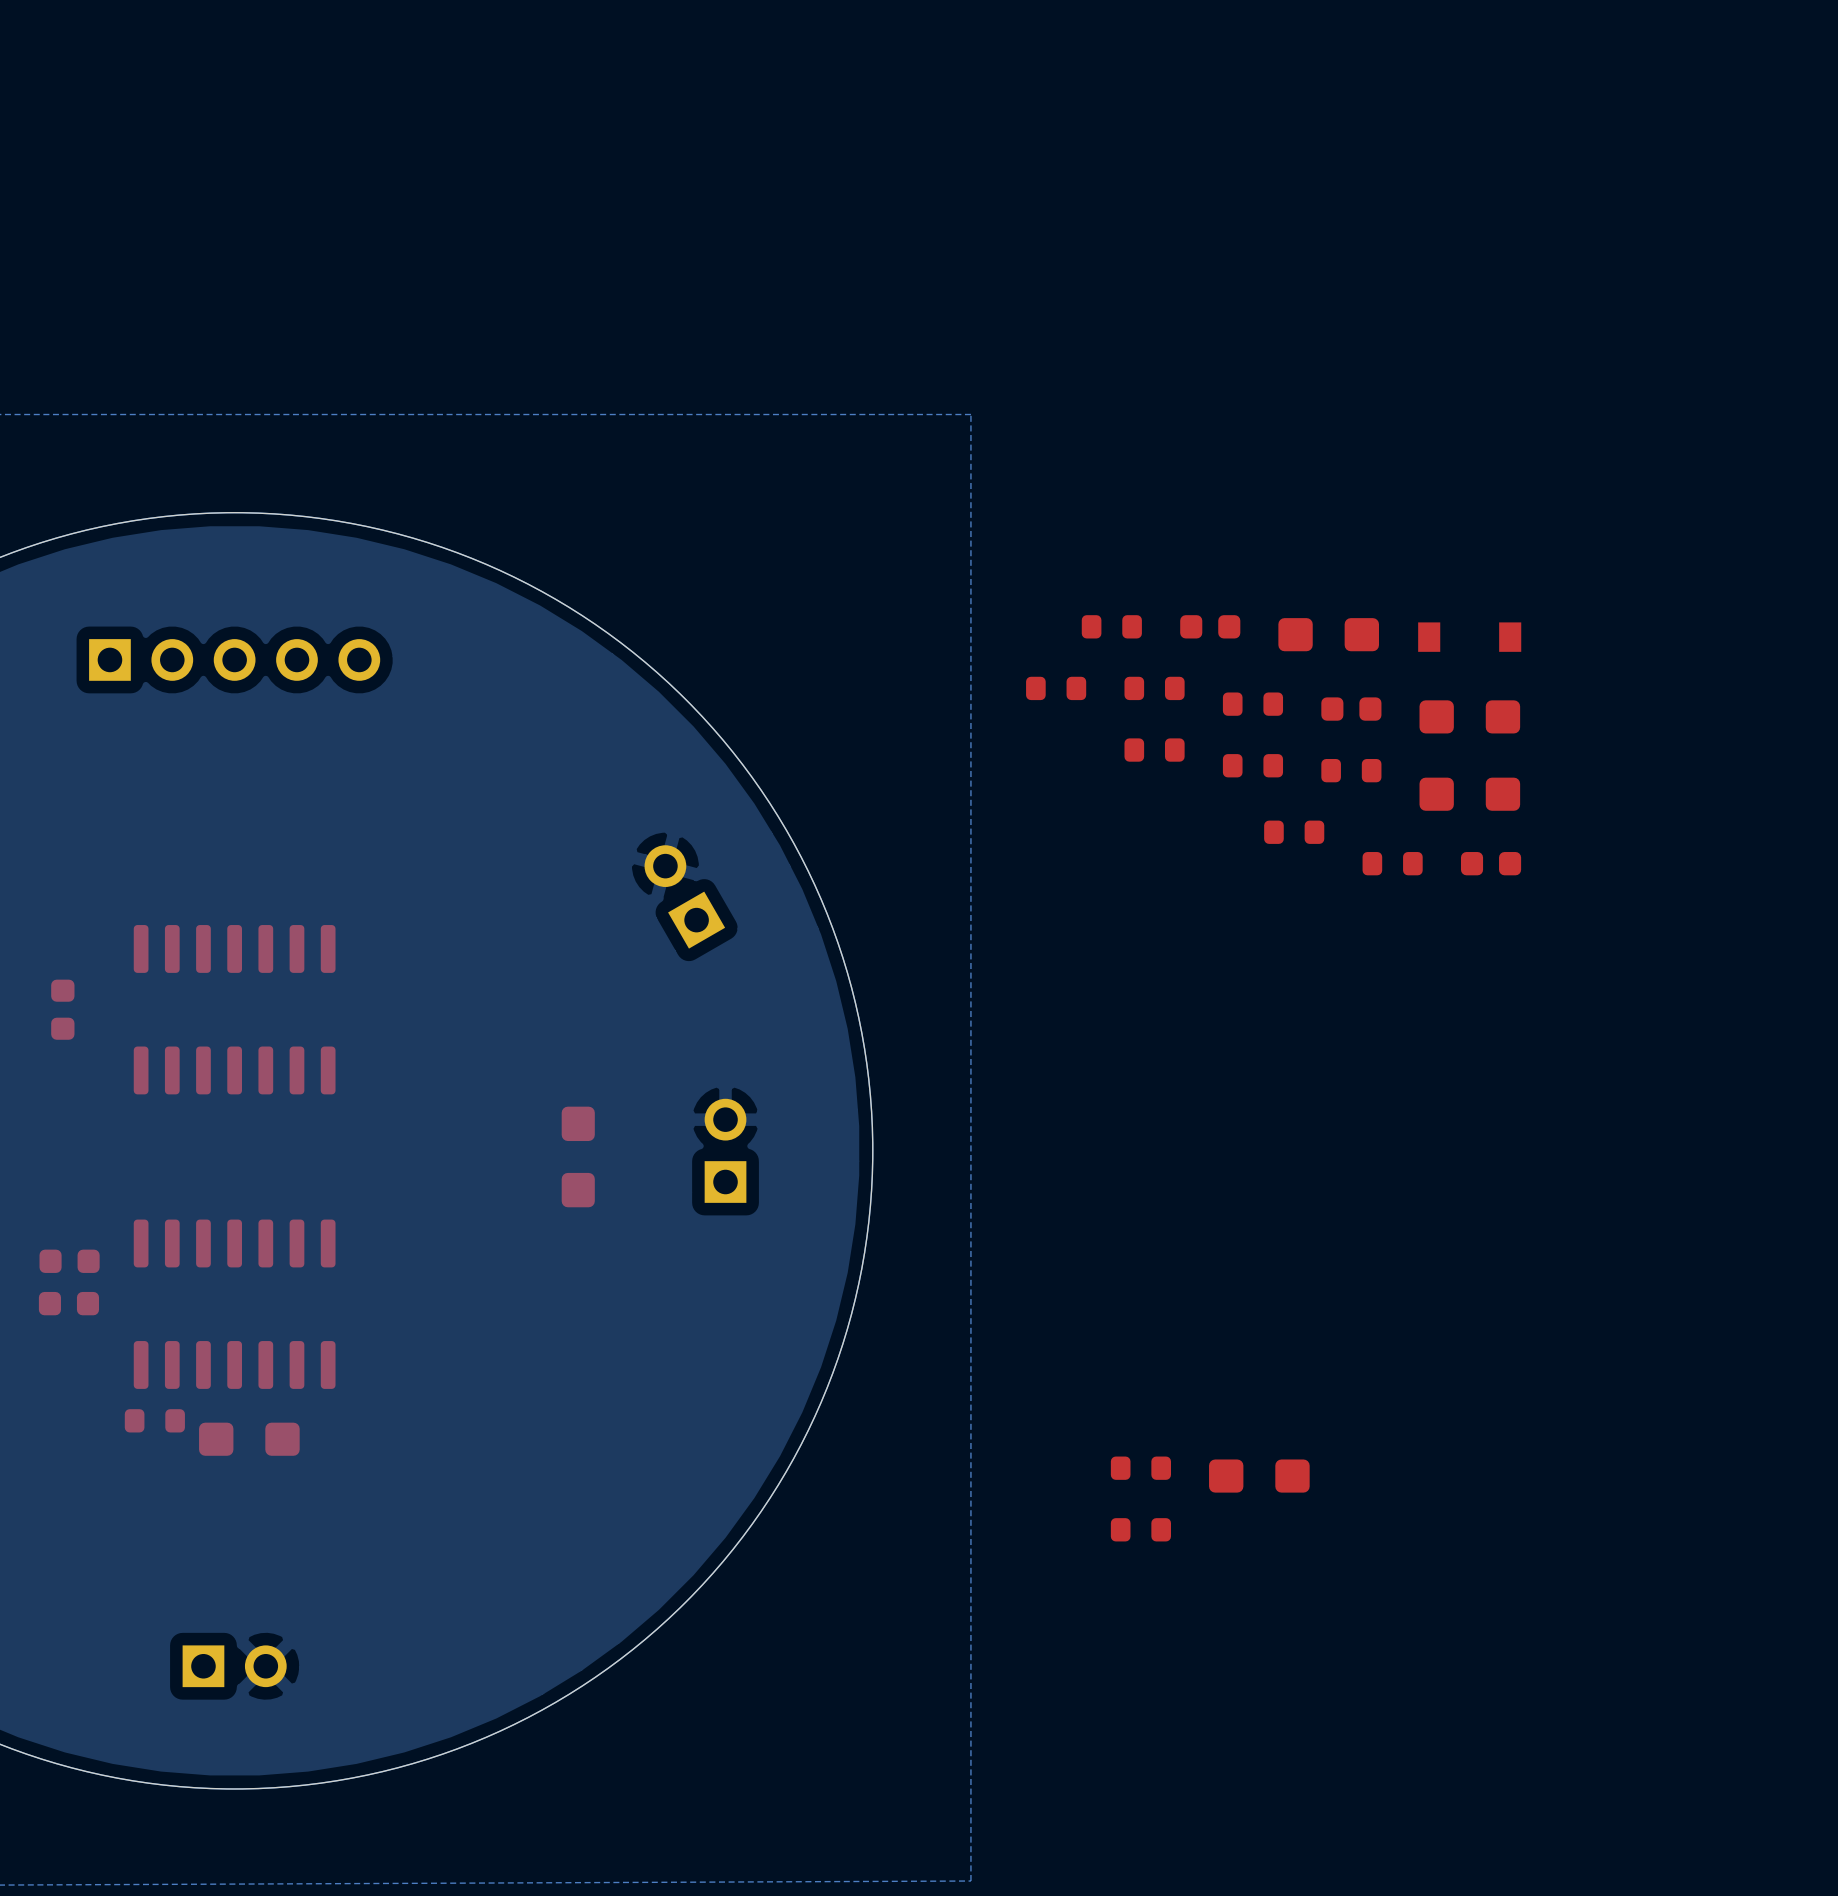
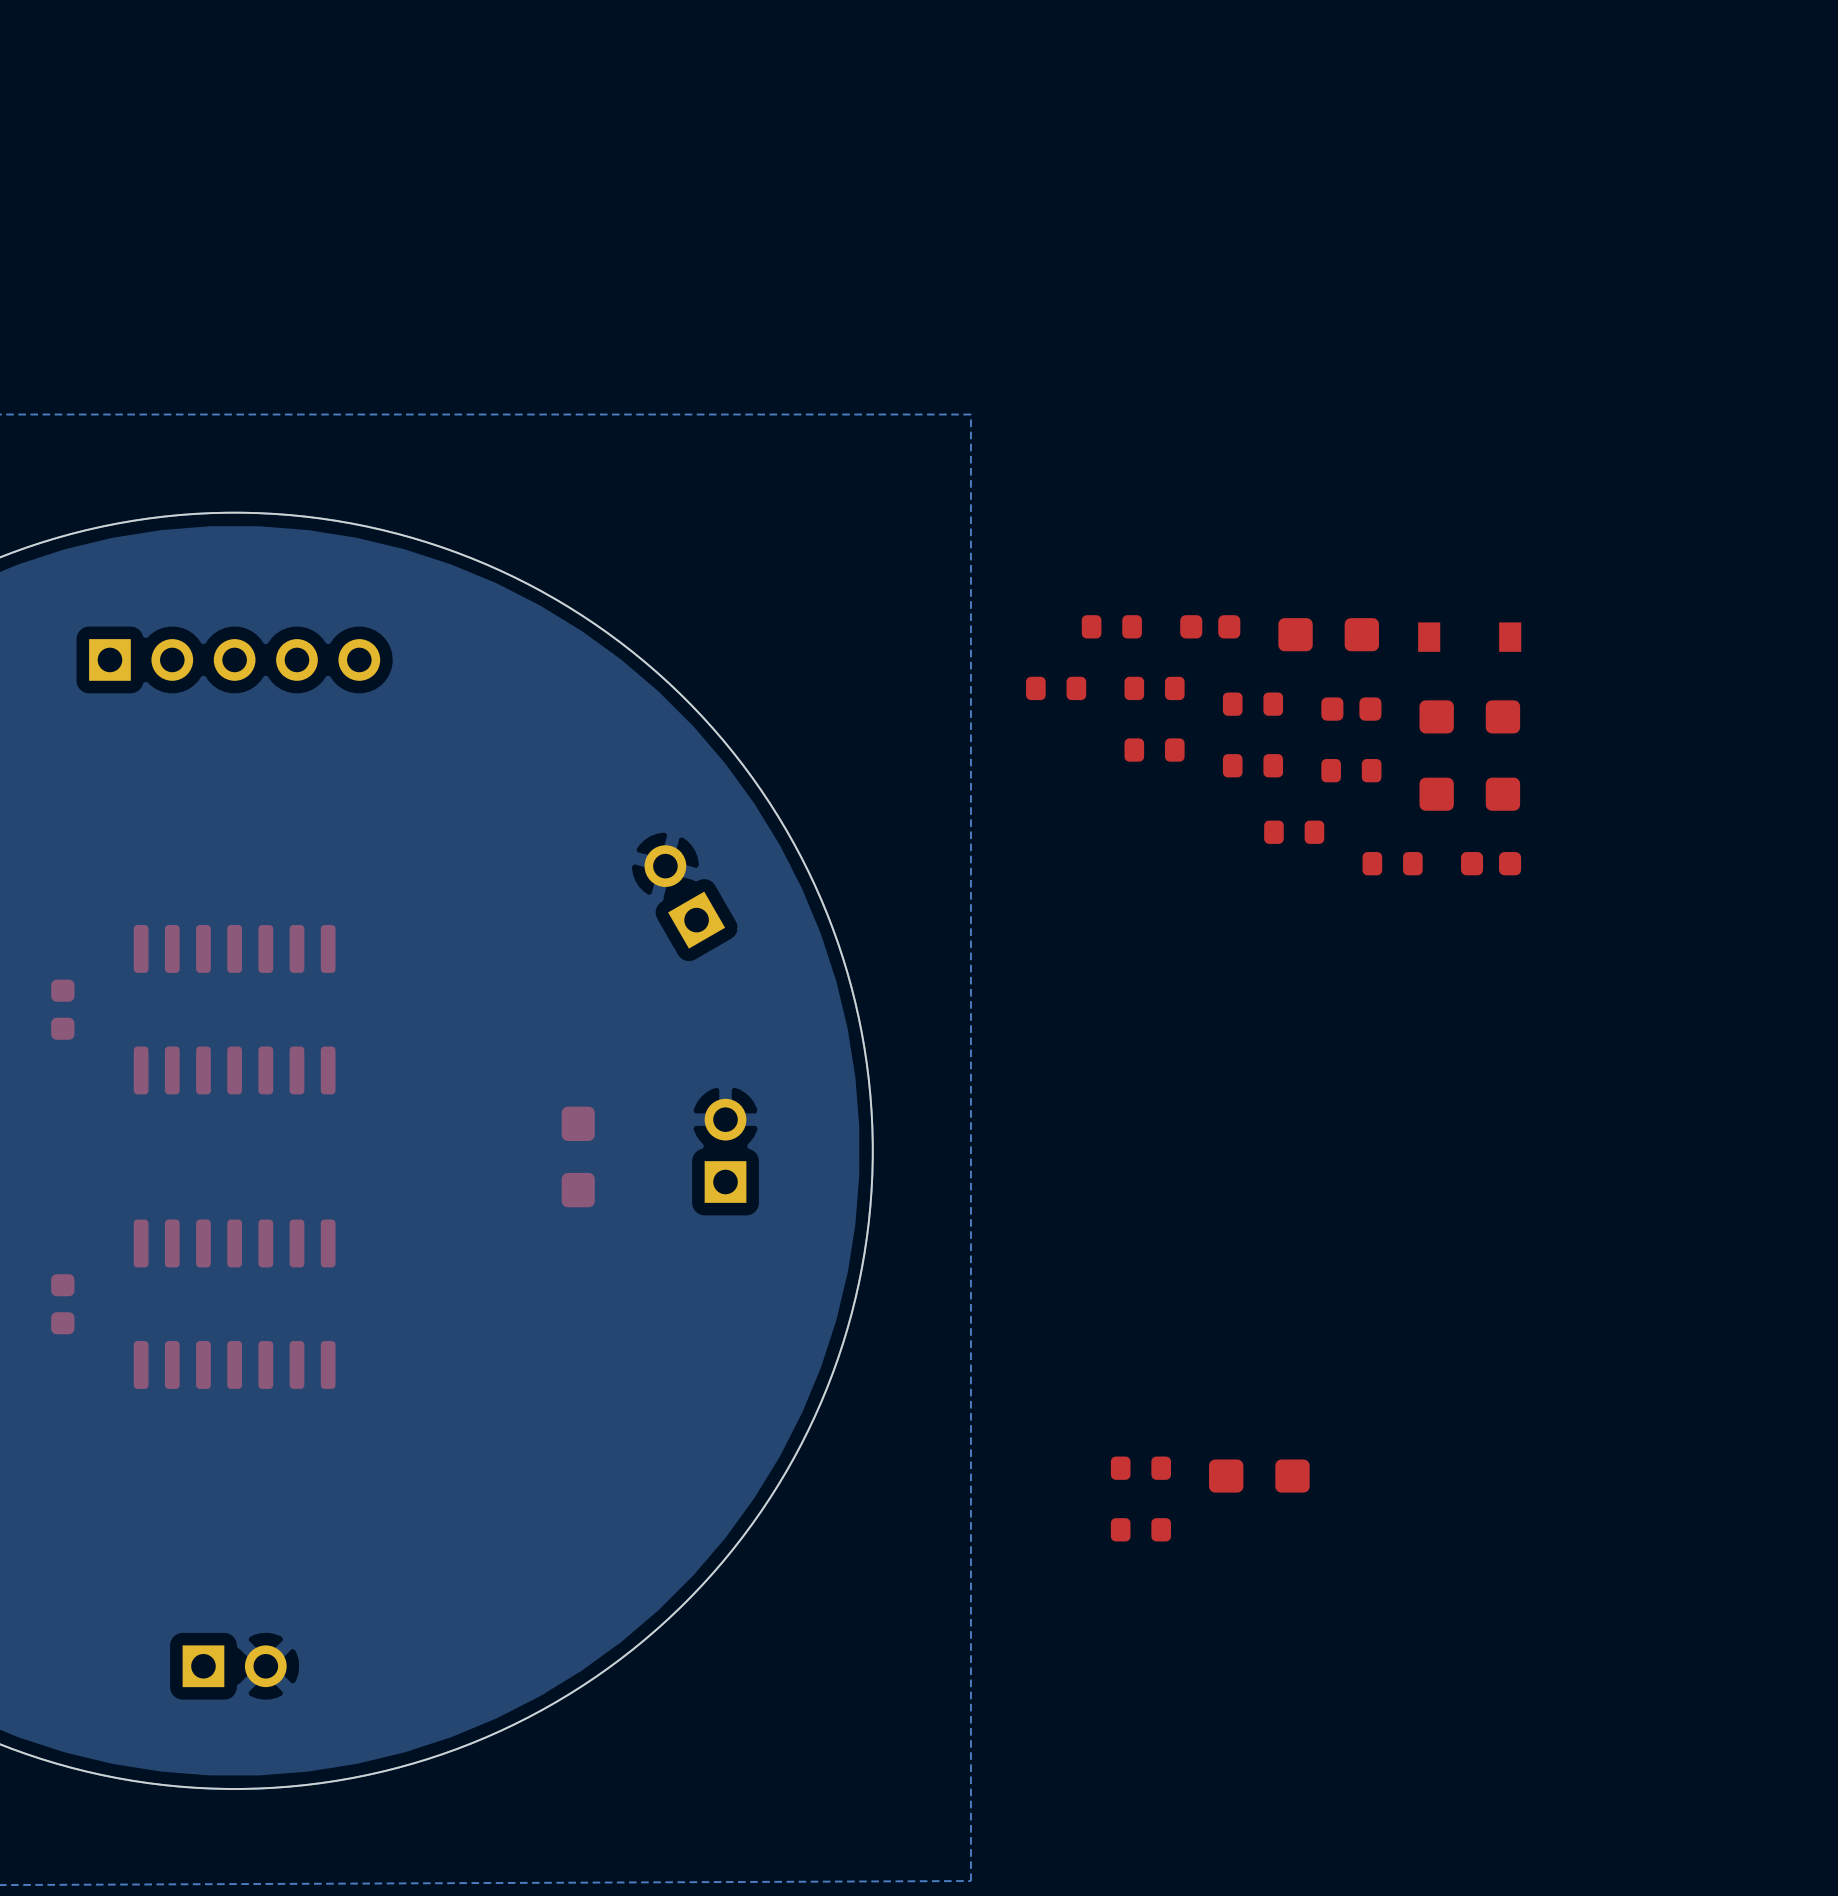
part: (69, 1261) -> none
part rotation: 0° (68, 1303) -> 90° clockwise (62, 1304)
part: (154, 1420) -> none
part: (249, 1439) -> none

